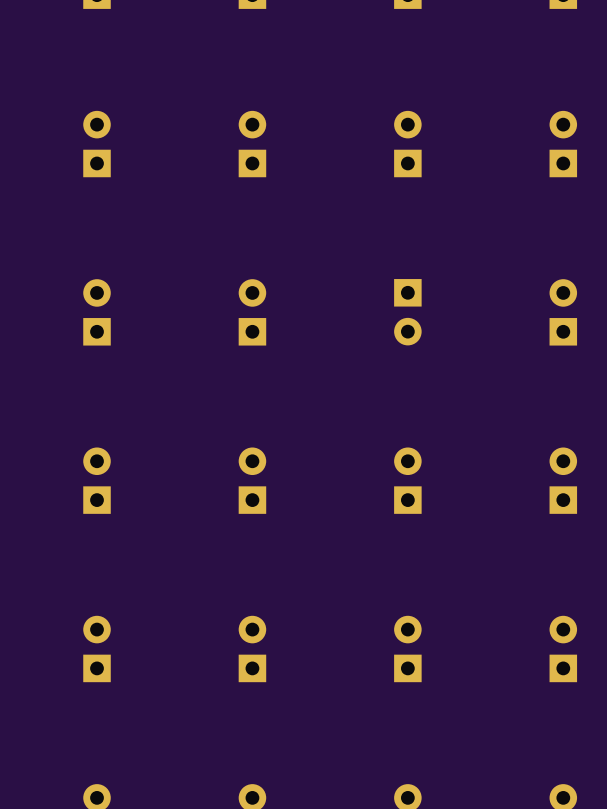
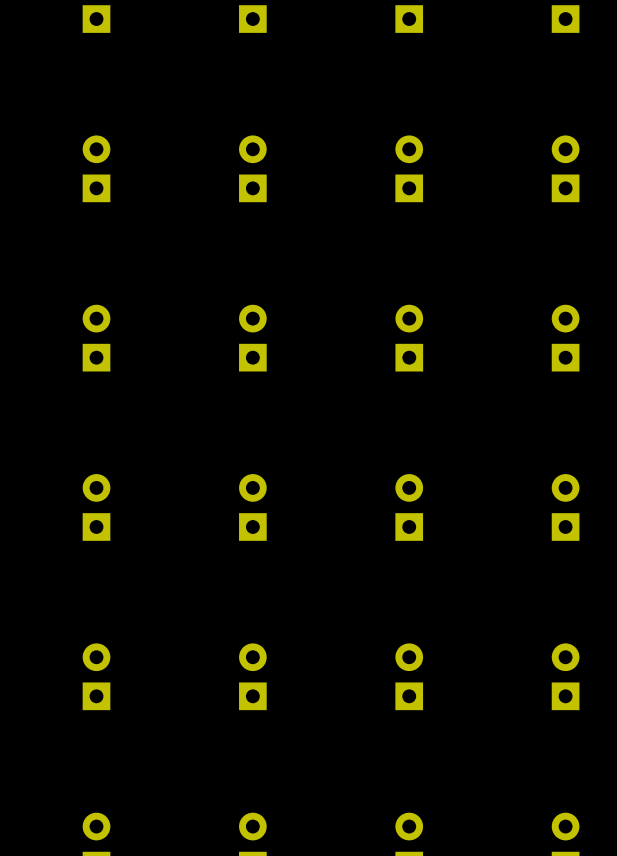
part rotation: 0° (407, 312) -> 180° (409, 338)

